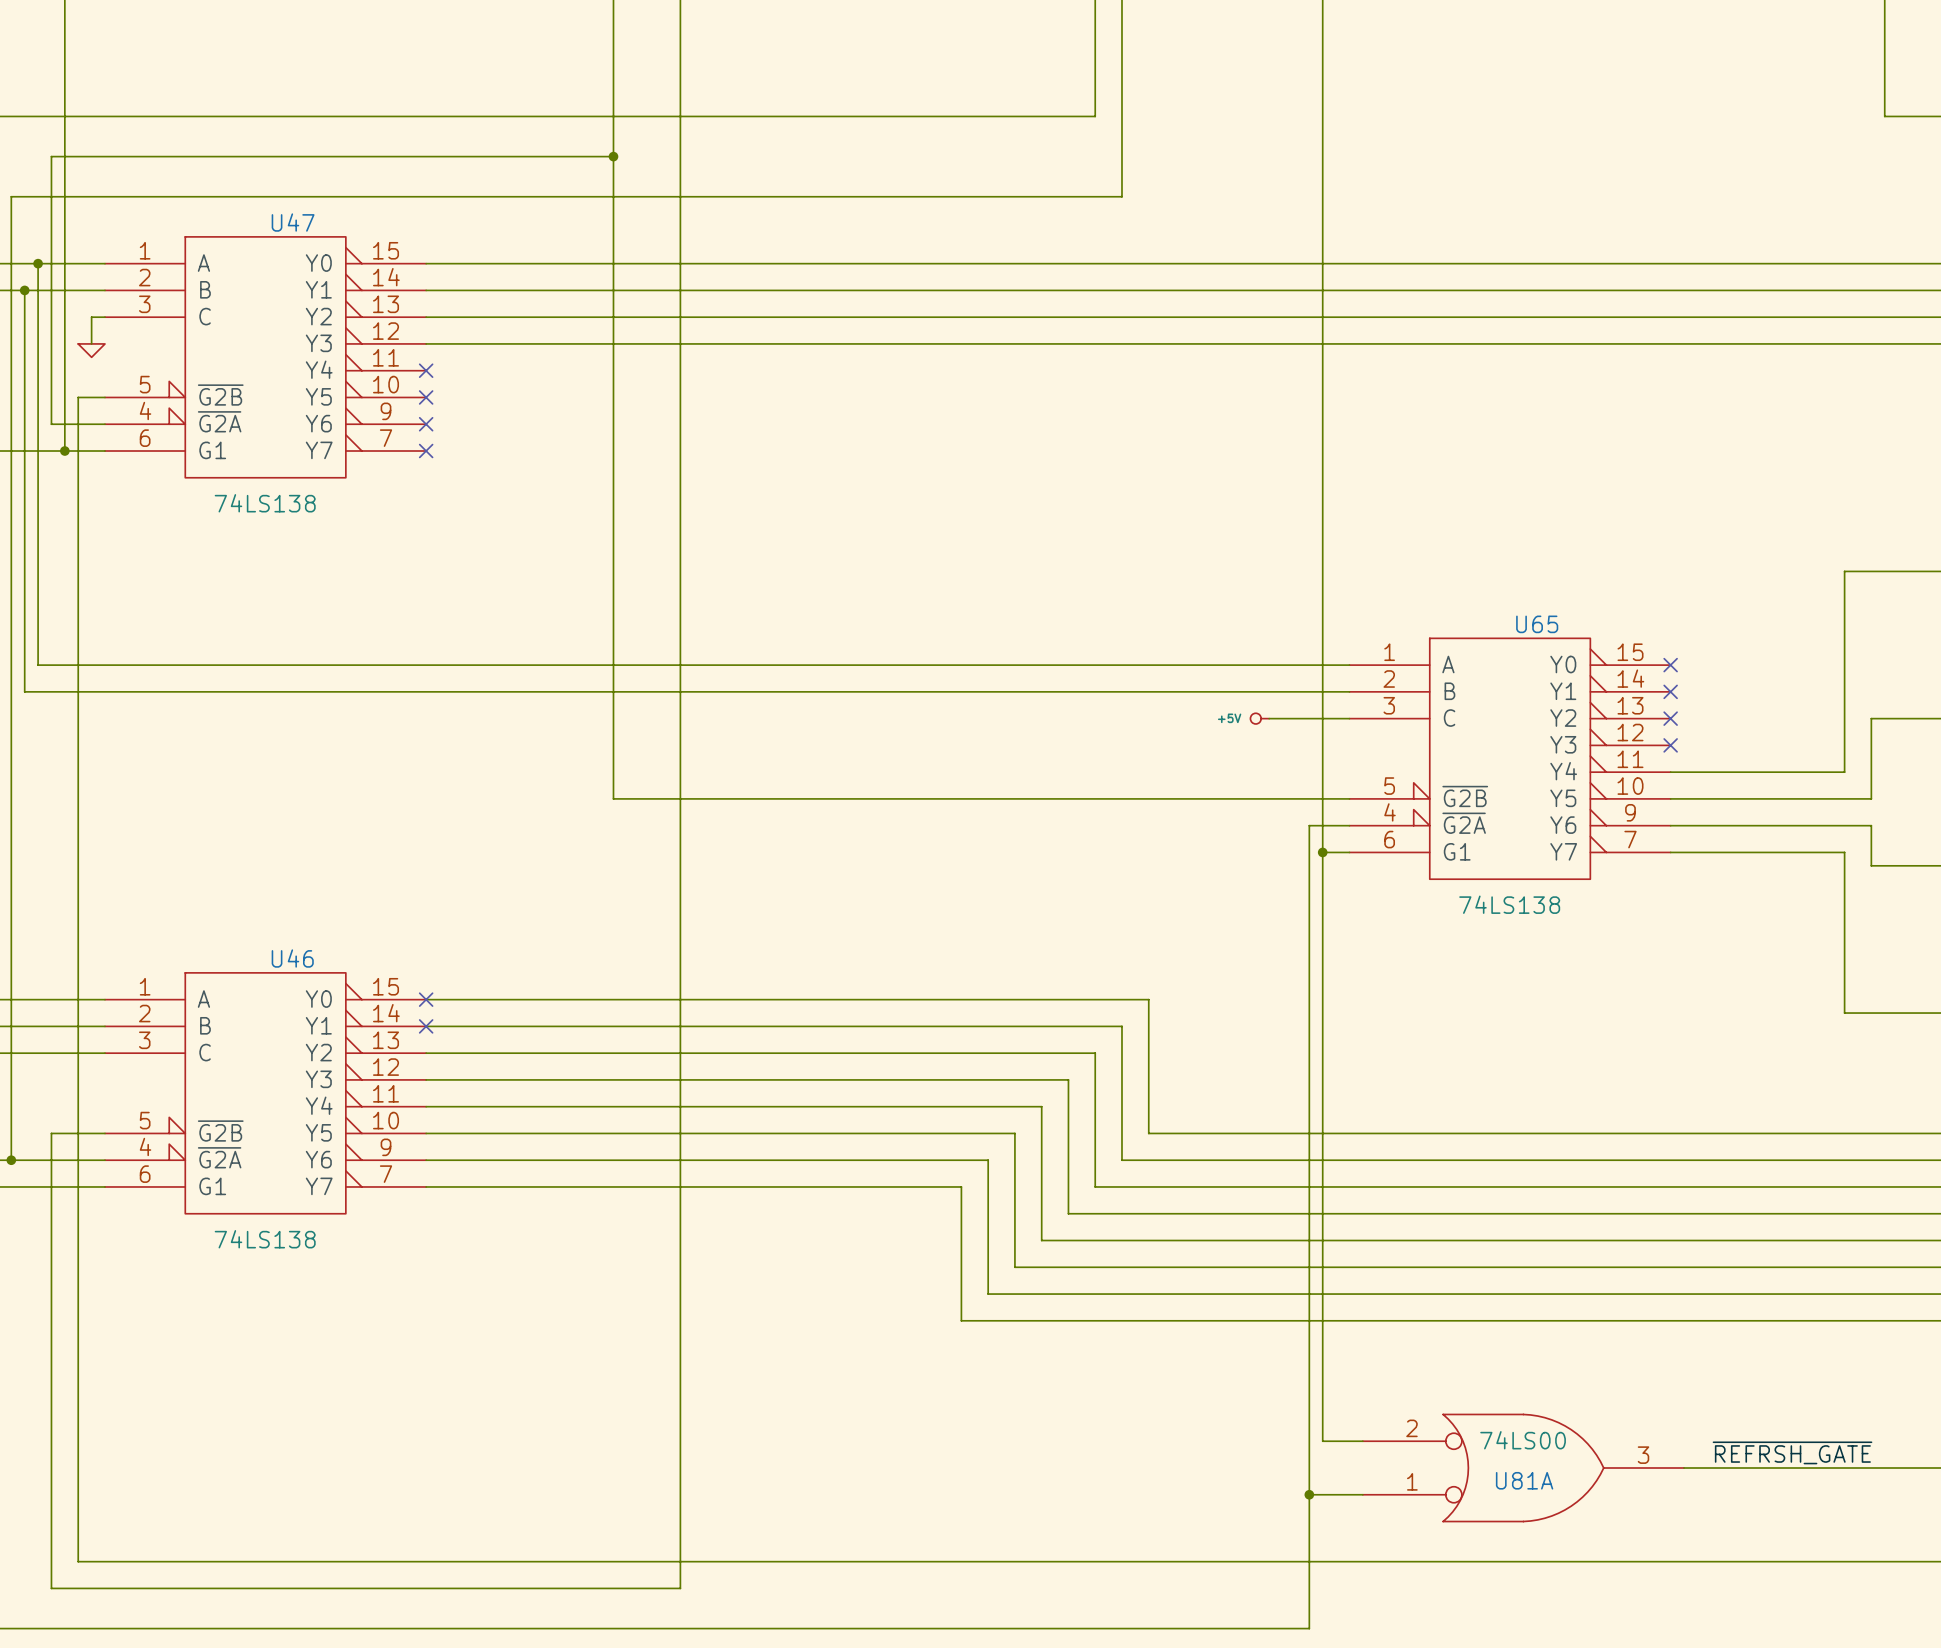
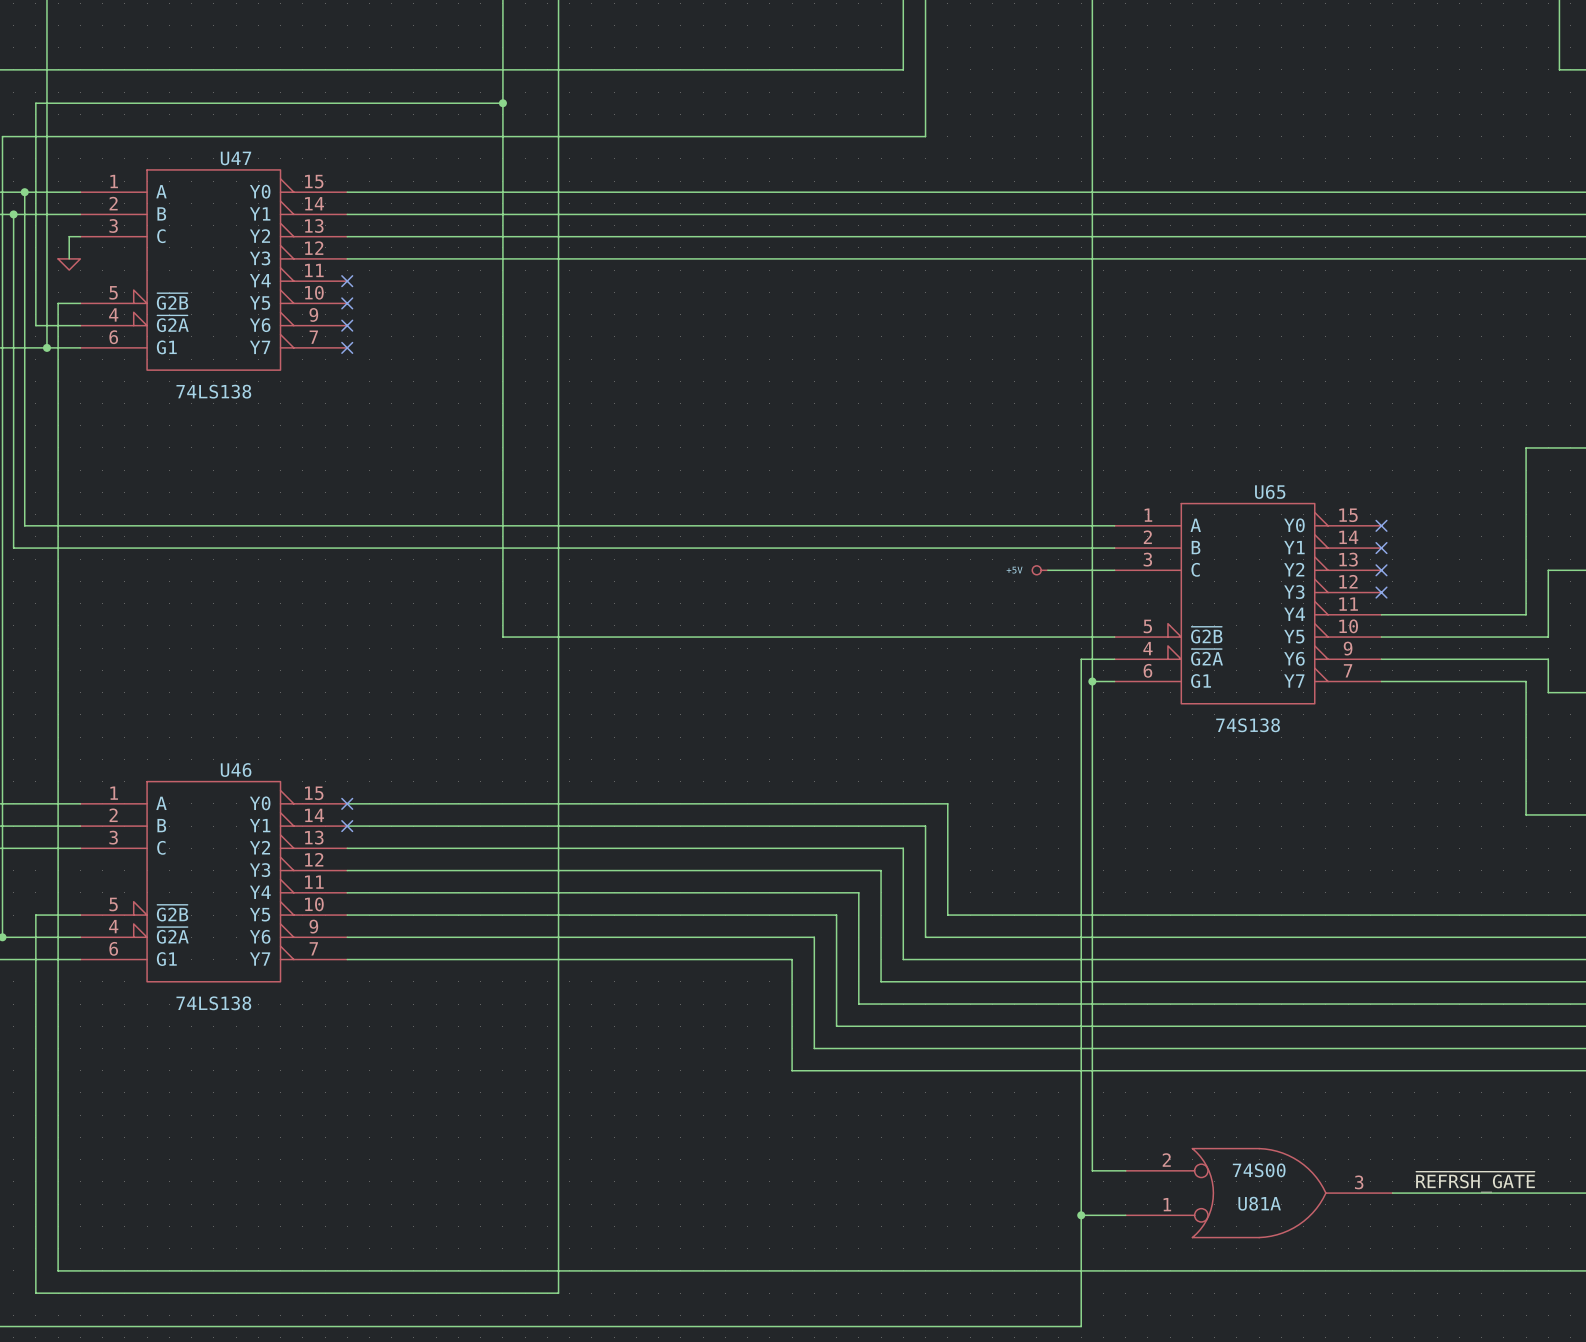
U65 value: 74LS138 (1509, 904) -> 74S138 (1248, 725)
U81A value: 74LS00 (1523, 1440) -> 74S00 (1259, 1170)

